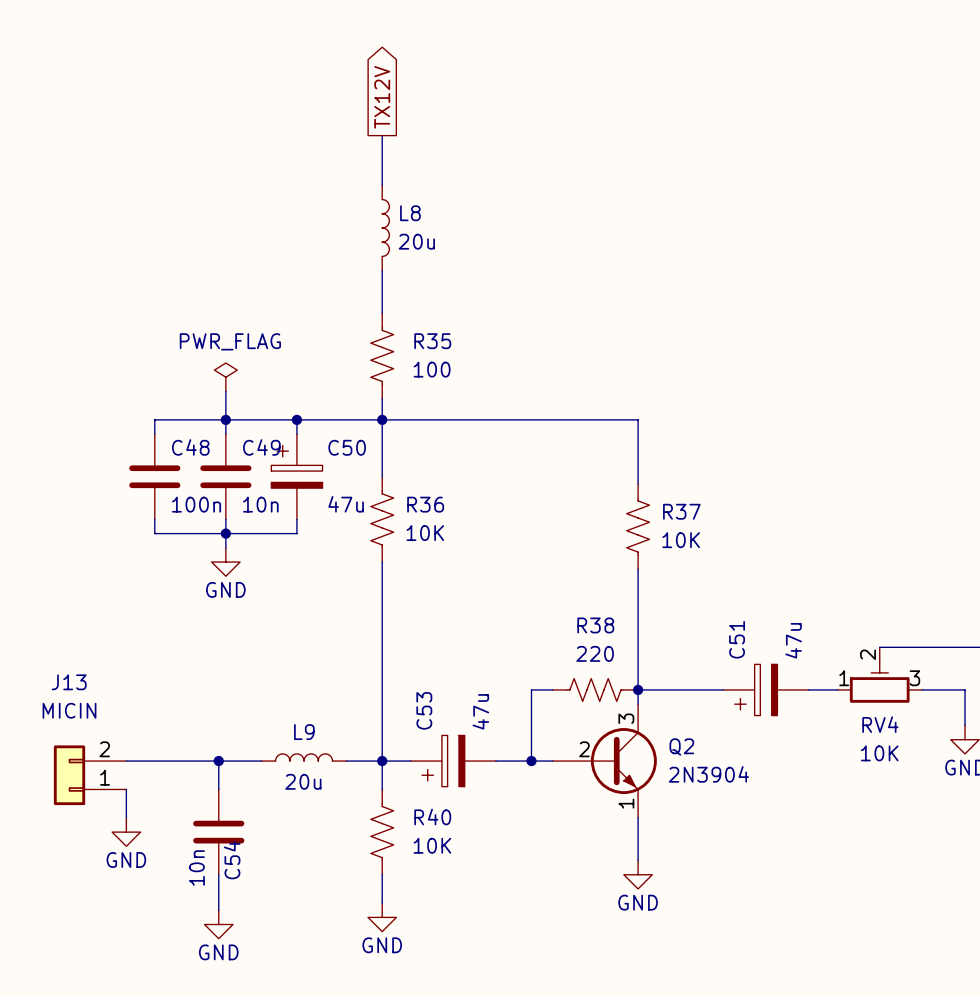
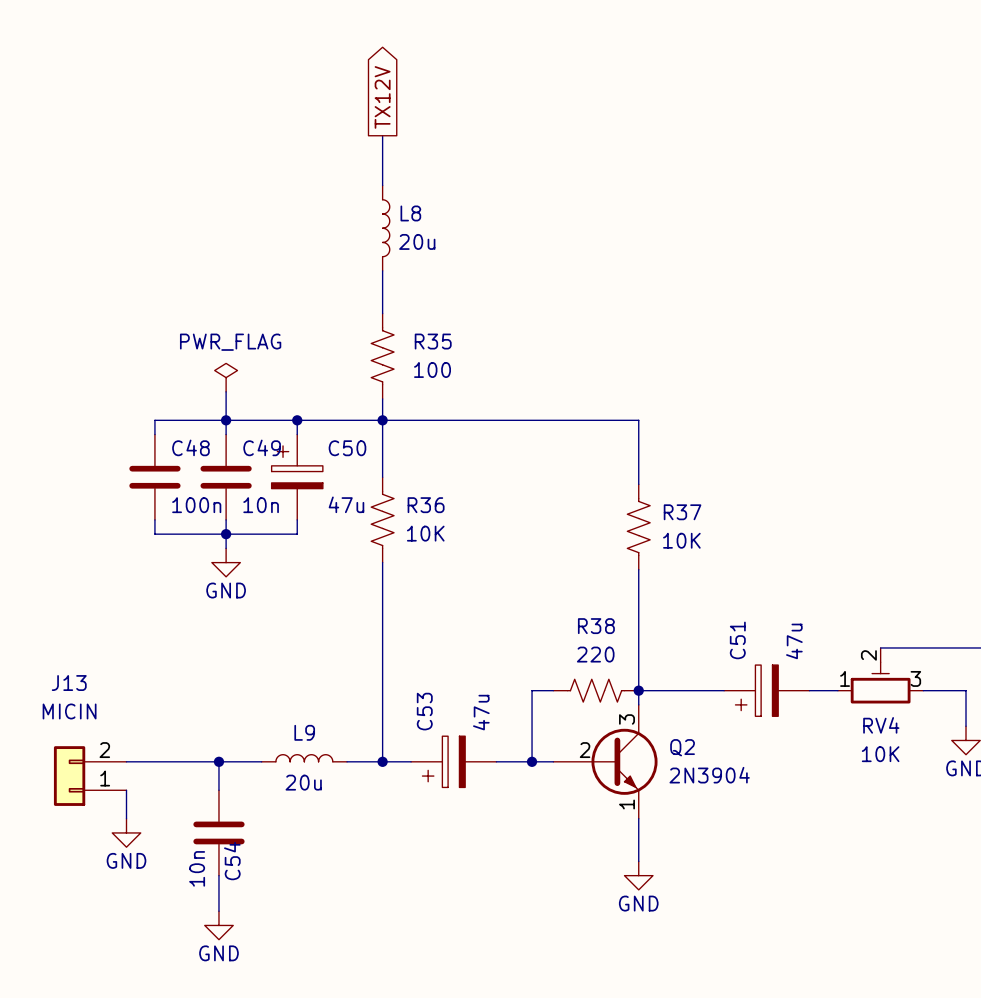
wire: (382, 761) (382, 789) -> none
R40: 10K (382, 832) -> none
wire: (382, 874) (382, 903) -> none
power symbol: GND (382, 917) -> none

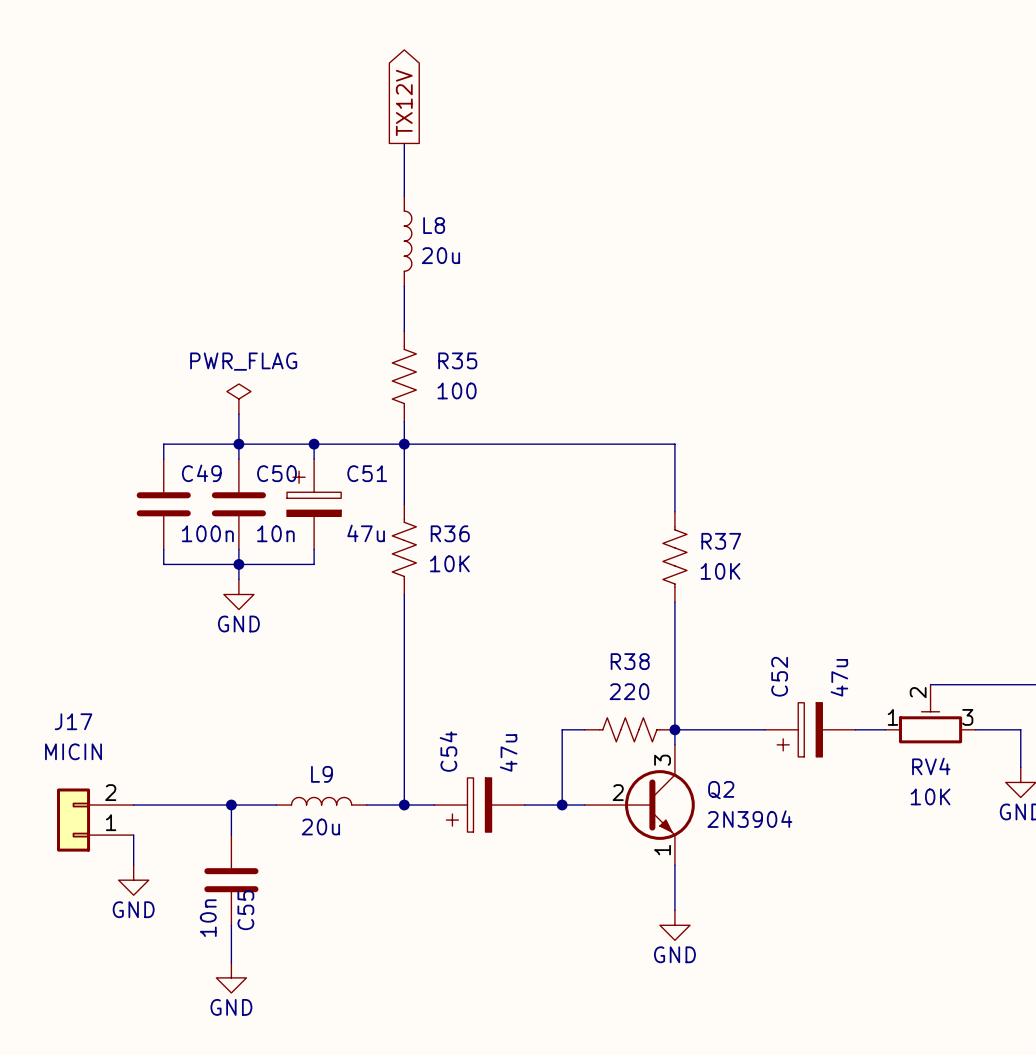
C48 name: C48 (190, 447) -> C49 (201, 473)
C49 name: C49 (262, 447) -> C50 (276, 473)
C50 name: C50 (347, 448) -> C51 (367, 473)
C51 name: C51 (737, 640) -> C52 (779, 676)
J13 name: J13 (69, 683) -> J17 (73, 721)
C53 name: C53 (424, 711) -> C54 (448, 751)
C54 name: C54 (232, 861) -> C55 (245, 910)

